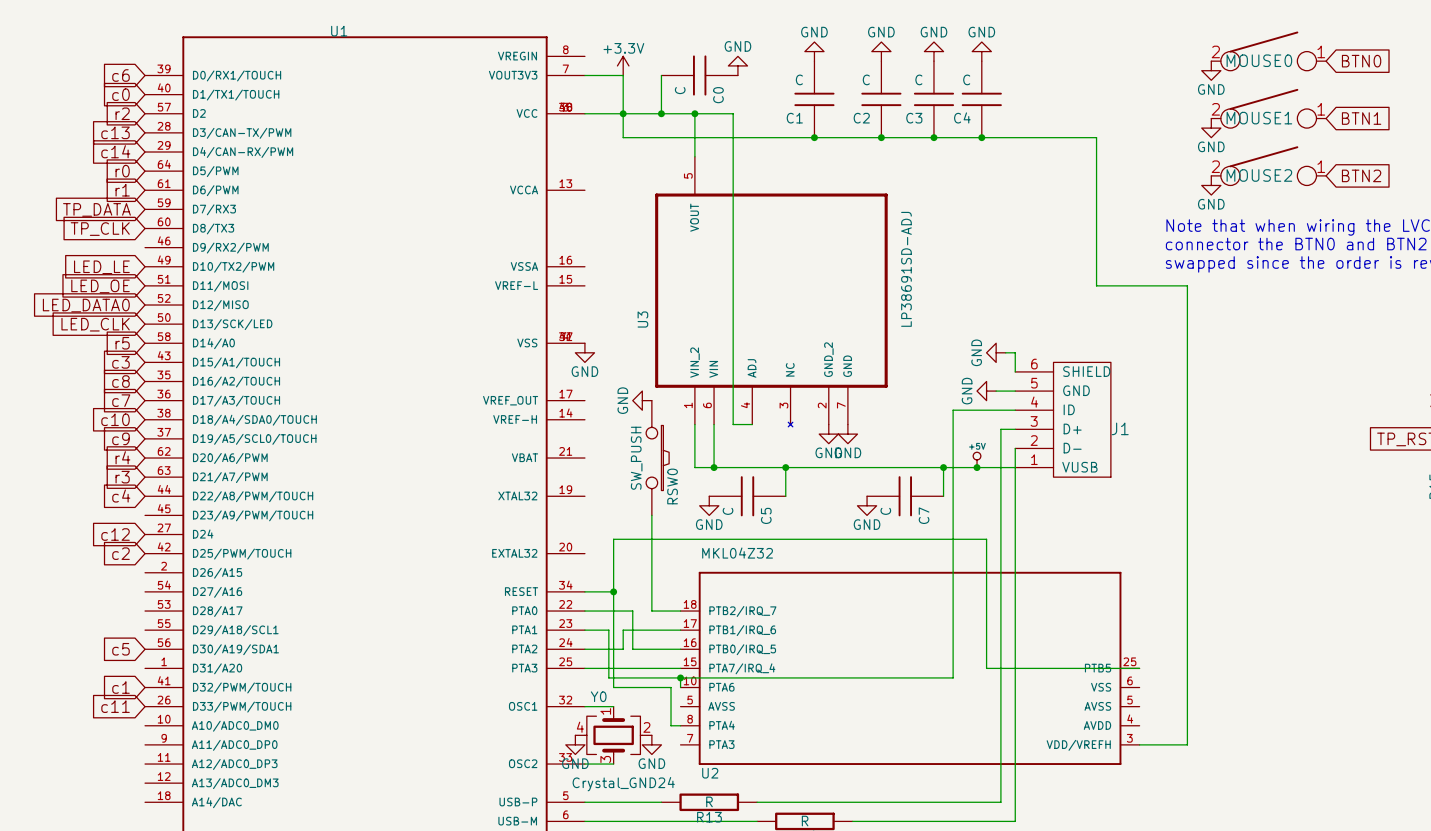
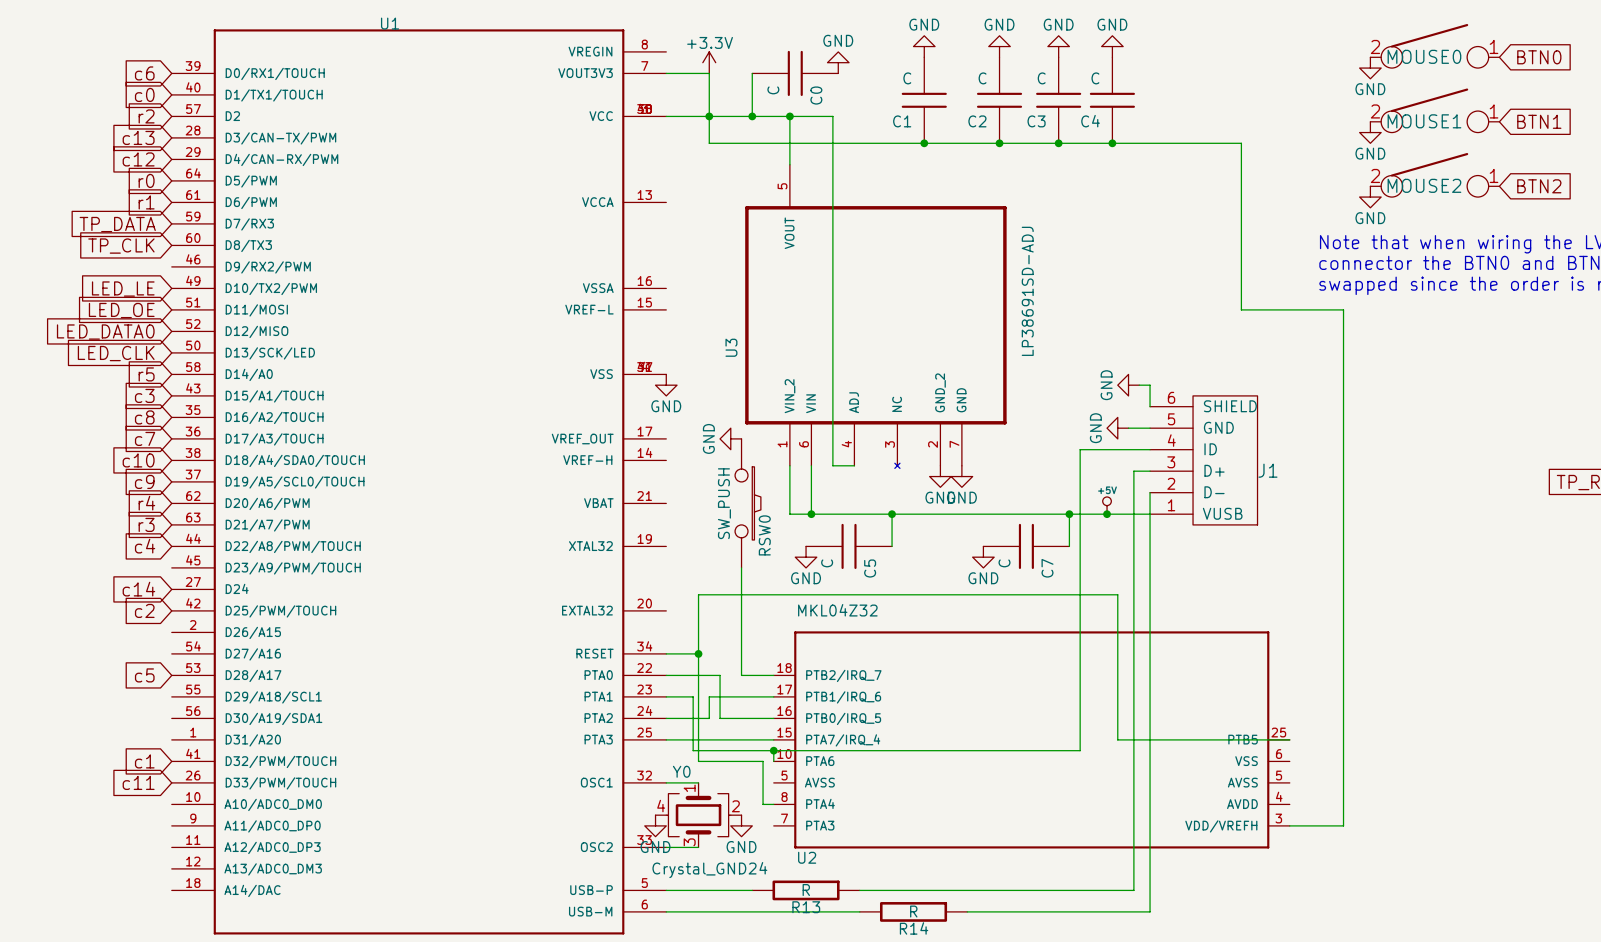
global label: c14 (115, 151) -> c12 (138, 159)
global label: c12 (115, 534) -> c14 (138, 589)
global label position: c5 (121, 649) -> c5 (144, 675)

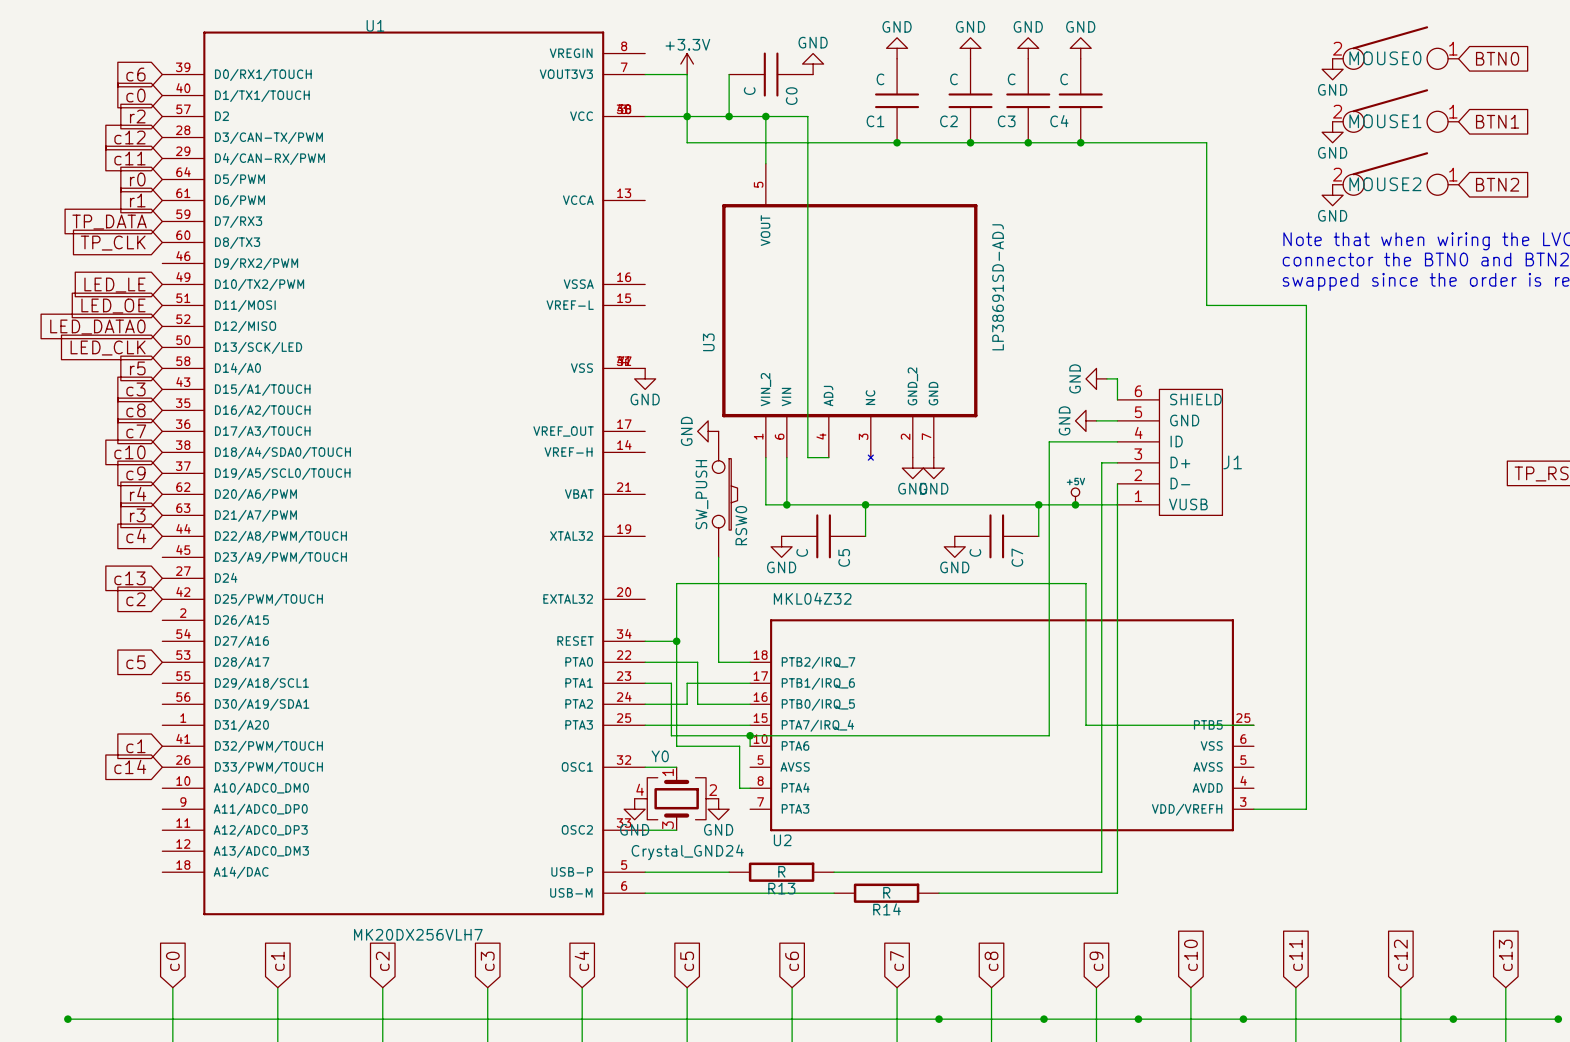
global label: c13 (138, 137) -> c12 (129, 137)
global label: c12 (138, 159) -> c11 (129, 158)
global label: c14 (138, 589) -> c13 (129, 578)
global label: c11 (138, 782) -> c14 (130, 766)

